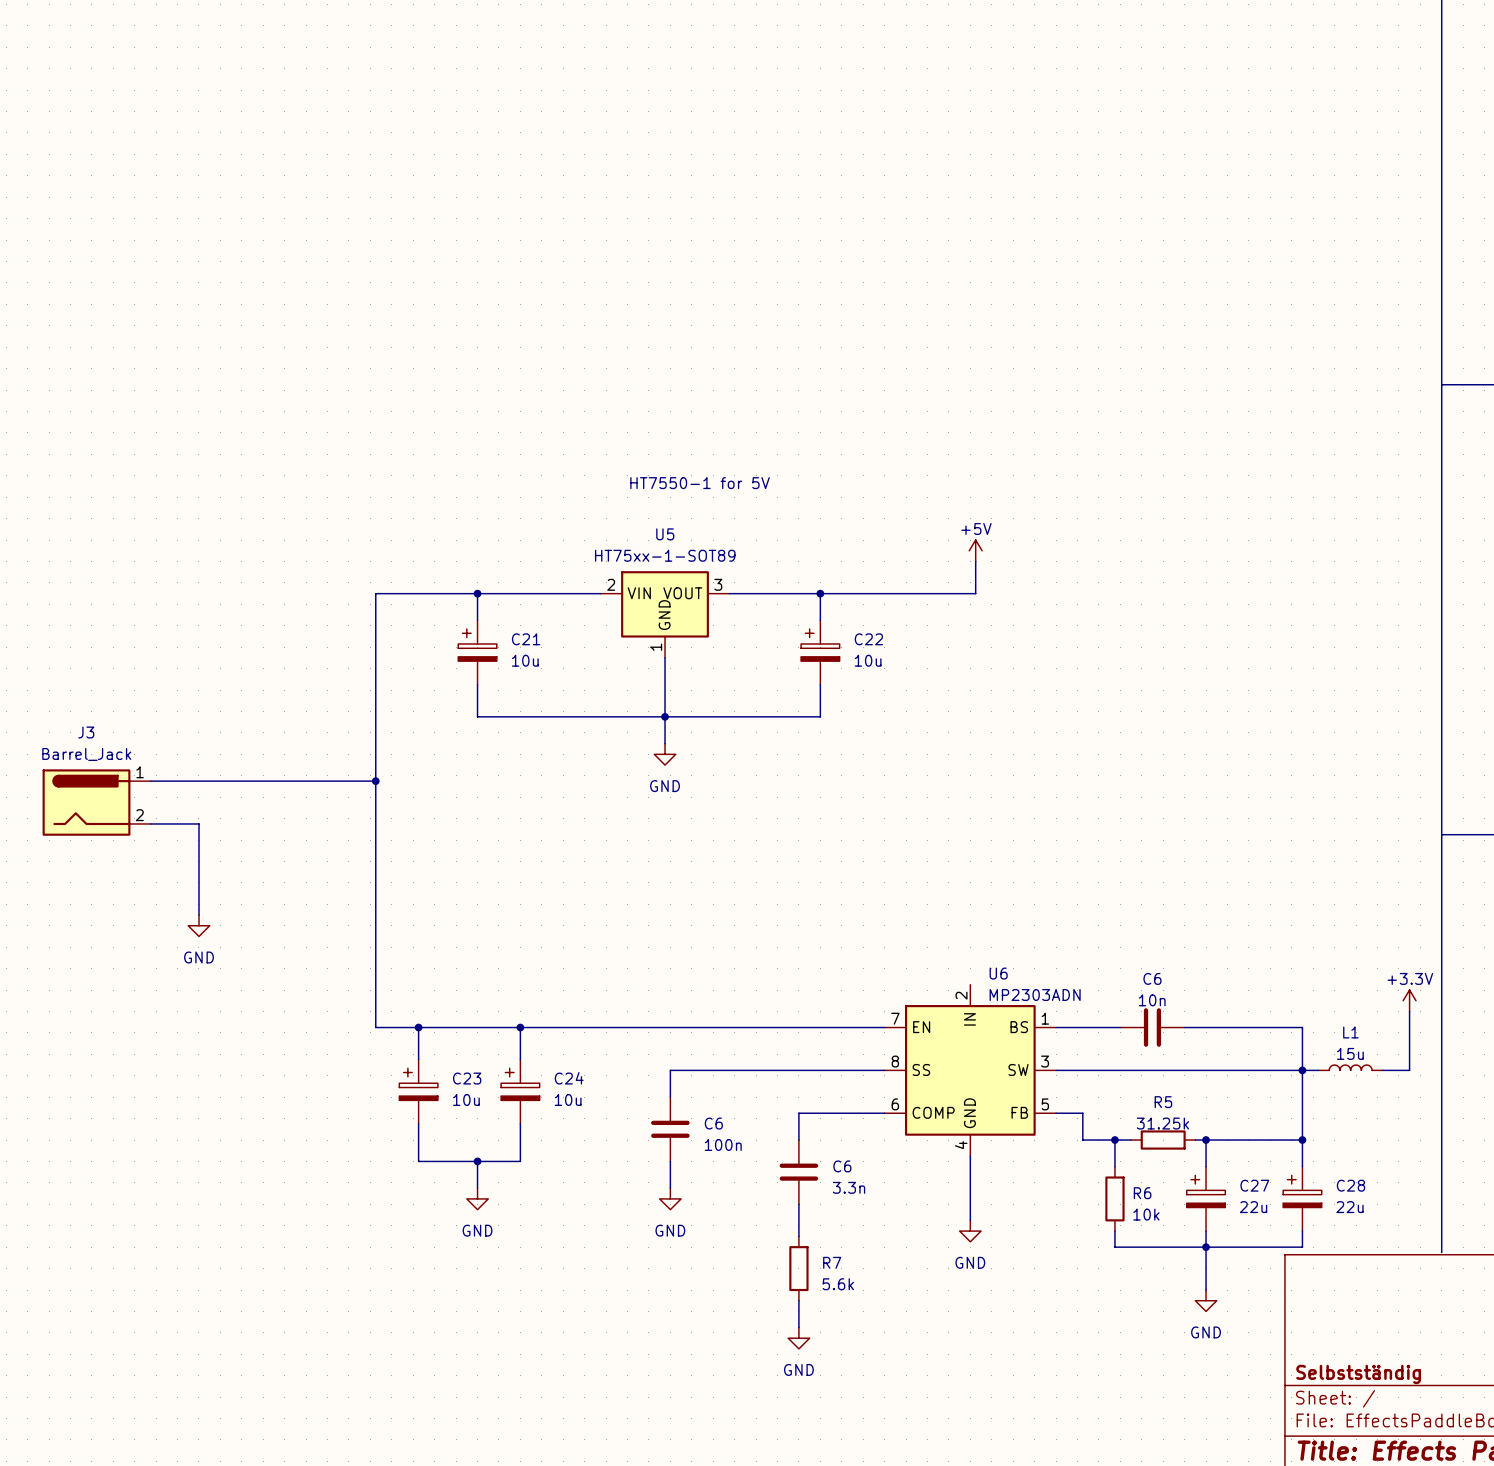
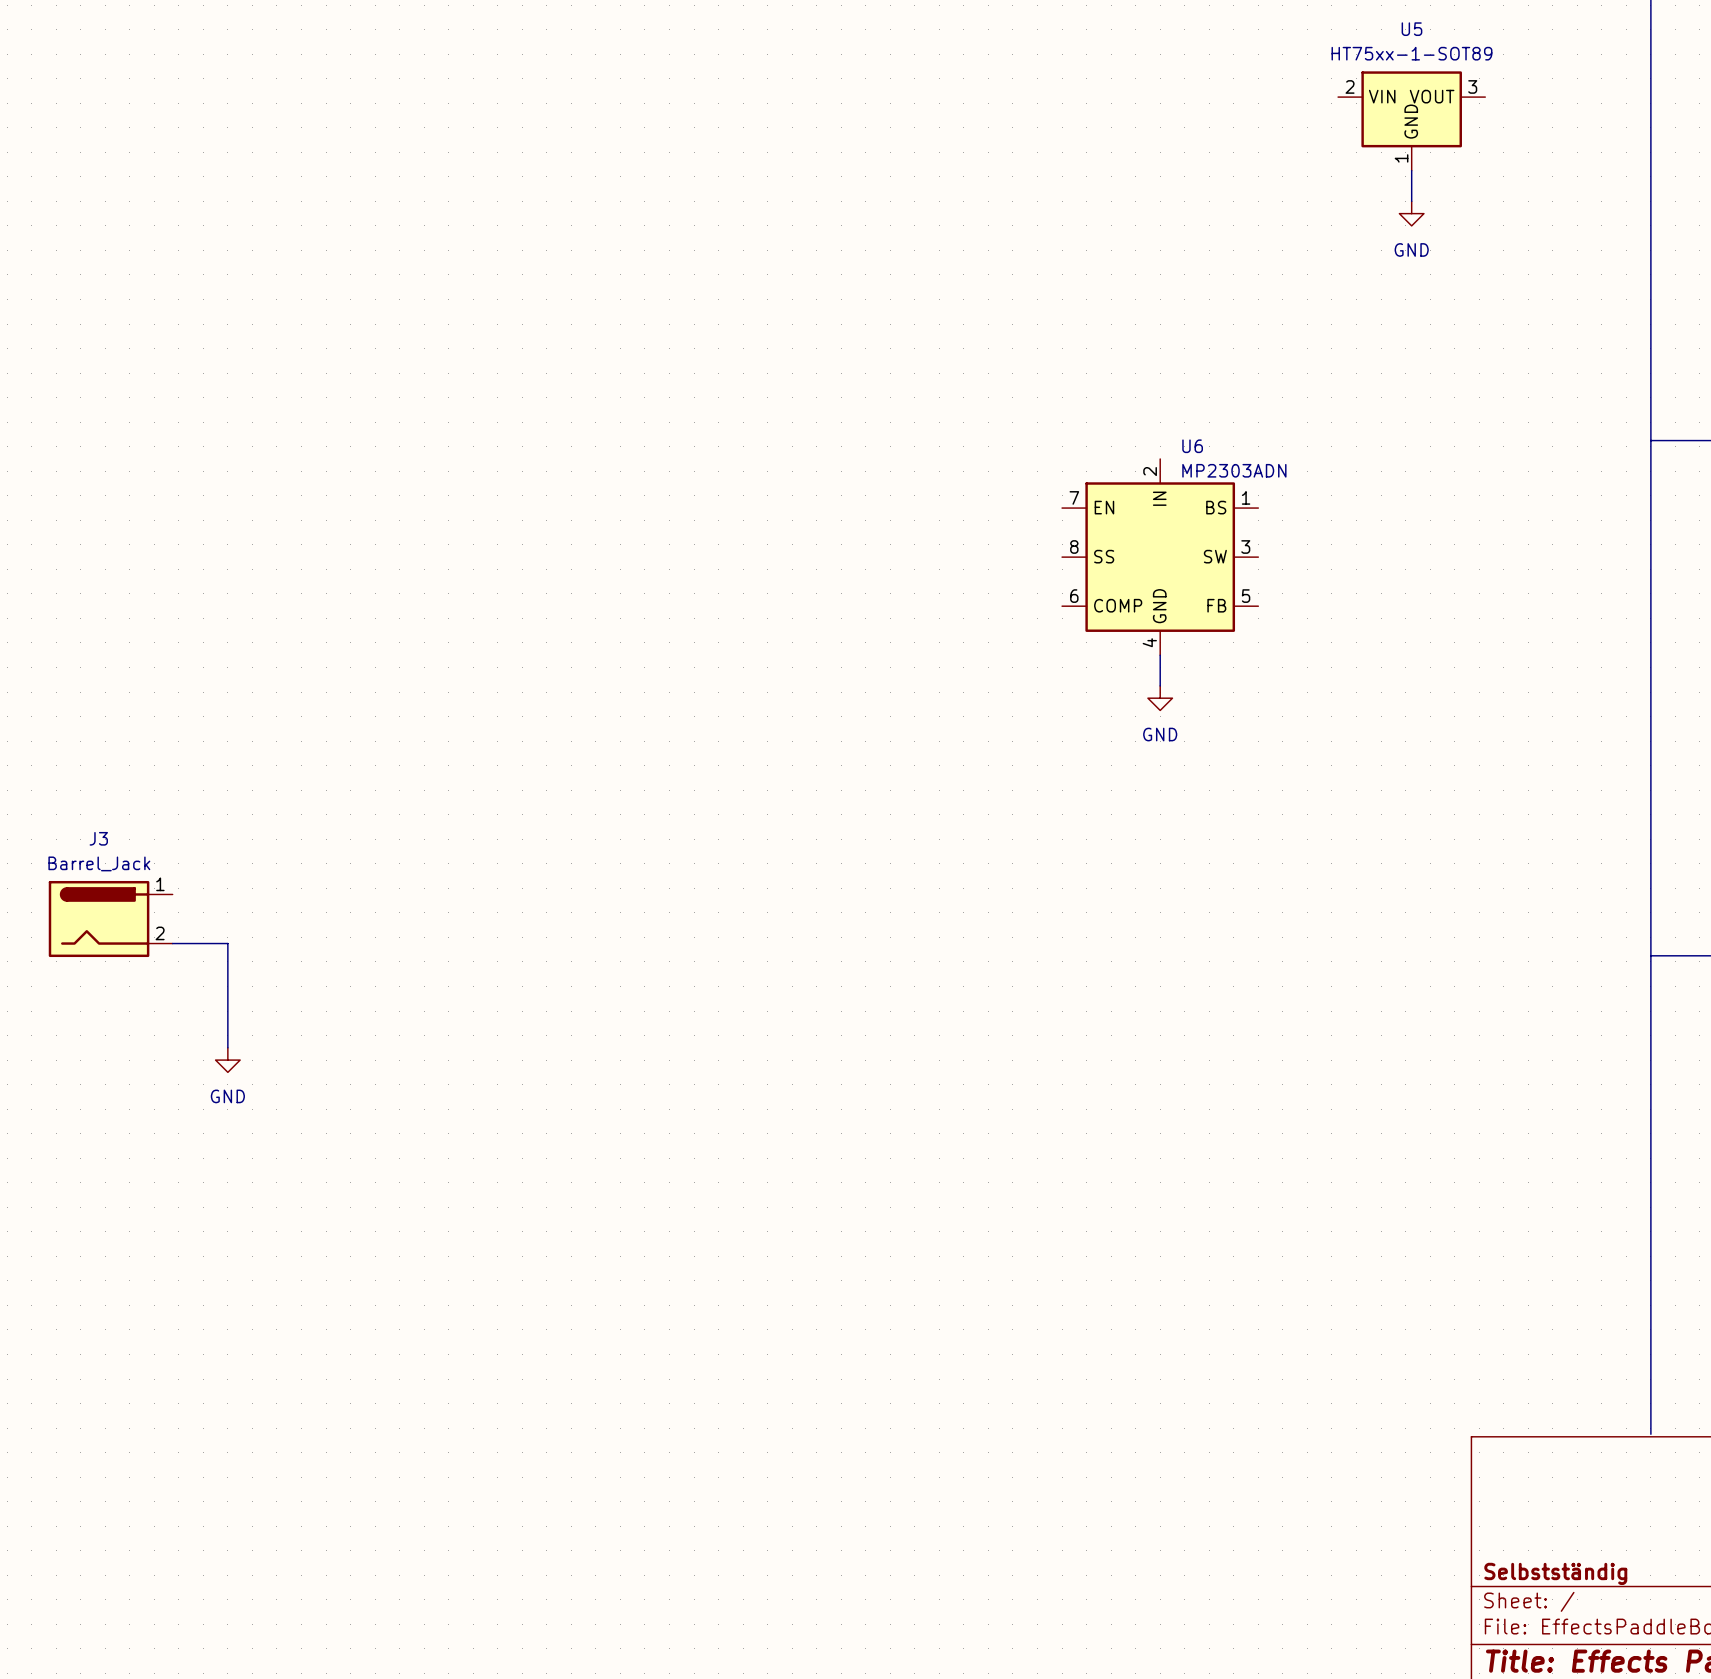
wire: none -> (1411, 170) (1411, 201)
power symbol: none -> GND (1411, 213)
text: HT7550-1 for 5V (700, 483) -> none
power symbol: +5V (975, 550) -> none
wire: (975, 561) (975, 593) (729, 593) -> none
wire: (477, 593) (477, 620) -> none
junction: (477, 593) -> none
wire: (600, 593) (375, 593) (375, 1027) (884, 1027) -> none
wire: (820, 593) (820, 620) -> (1160, 655) (1160, 685)
junction: (820, 593) -> none
power symbol: none -> GND (1160, 698)
U5 position: (665, 614) -> (1411, 121)
C21: 10u (477, 652) -> none
C22: 10u (820, 652) -> none
wire: (665, 657) (665, 743) -> none
wire: (477, 684) (477, 716) (820, 716) (820, 684) -> none
junction: (665, 716) -> none
power symbol: GND (665, 754) -> none
wire: (150, 781) (375, 781) -> none
junction: (375, 781) -> none
power symbol: +3.3V (1409, 1000) -> none
wire: (1409, 1011) (1409, 1070) (1382, 1070) -> none
wire: (418, 1027) (418, 1059) -> none
junction: (418, 1027) -> none
wire: (520, 1027) (520, 1059) -> none
junction: (520, 1027) -> none
wire: (1056, 1027) (1120, 1027) -> none
C6: 10n (1152, 1027) -> none
wire: (1184, 1027) (1302, 1027) (1302, 1166) -> none
L1: 15u (1350, 1067) -> none
wire: (884, 1070) (670, 1070) (670, 1097) -> none
U6 position: (970, 1070) -> (1160, 557)
wire: (1056, 1070) (1318, 1070) -> none
junction: (1302, 1070) -> none
C23: 10u (418, 1091) -> none
C24: 10u (520, 1091) -> none
wire: (884, 1113) (798, 1113) (798, 1140) -> none
wire: (1056, 1113) (1082, 1113) (1082, 1140) (1131, 1140) -> none
wire: (418, 1123) (418, 1161) (520, 1161) (520, 1123) -> none
C6: 100n (670, 1129) -> none
wire: (1114, 1140) (1114, 1166) -> none
junction: (1114, 1140) -> none
R5: 31.25k (1163, 1140) -> none
wire: (1195, 1140) (1302, 1140) -> none
wire: (1206, 1140) (1206, 1166) -> none
junction: (1206, 1140) -> none
junction: (1302, 1140) -> none
wire: (970, 1156) (970, 1220) -> none
wire: (477, 1161) (477, 1188) -> none
junction: (477, 1161) -> none
wire: (670, 1161) (670, 1188) -> none
C6: 3.3n (798, 1172) -> none
power symbol: GND (477, 1198) -> none
power symbol: GND (670, 1198) -> none
R6: 10k (1114, 1198) -> none
C27: 22u (1206, 1198) -> none
C28: 22u (1302, 1198) -> none
wire: (798, 1204) (798, 1236) -> none
power symbol: GND (970, 1231) -> none
wire: (1114, 1231) (1114, 1247) (1302, 1247) (1302, 1231) -> none
wire: (1206, 1231) (1206, 1290) -> none
junction: (1206, 1247) -> none
R7: 5.6k (798, 1268) -> none
wire: (798, 1300) (798, 1327) -> none
power symbol: GND (1206, 1300) -> none
power symbol: GND (798, 1338) -> none

